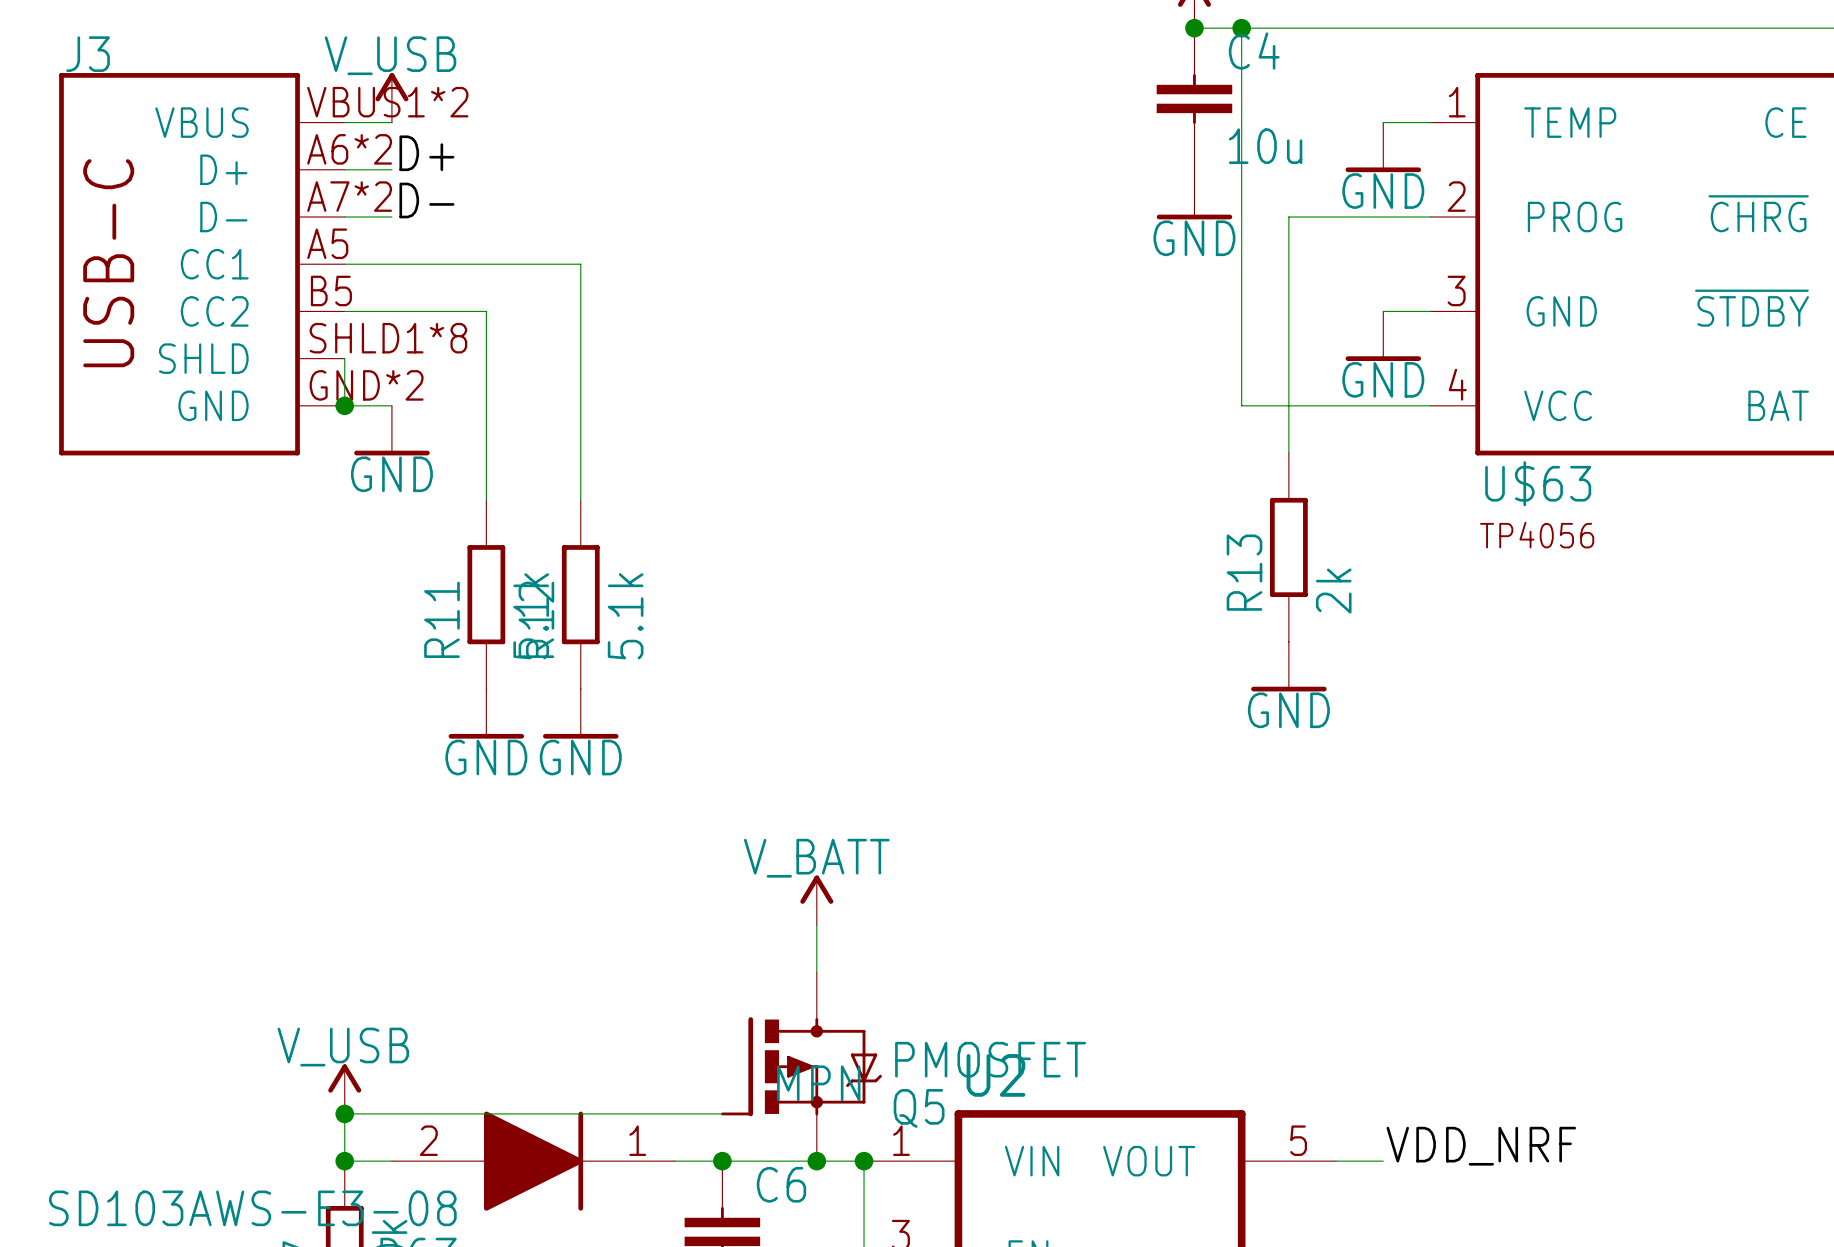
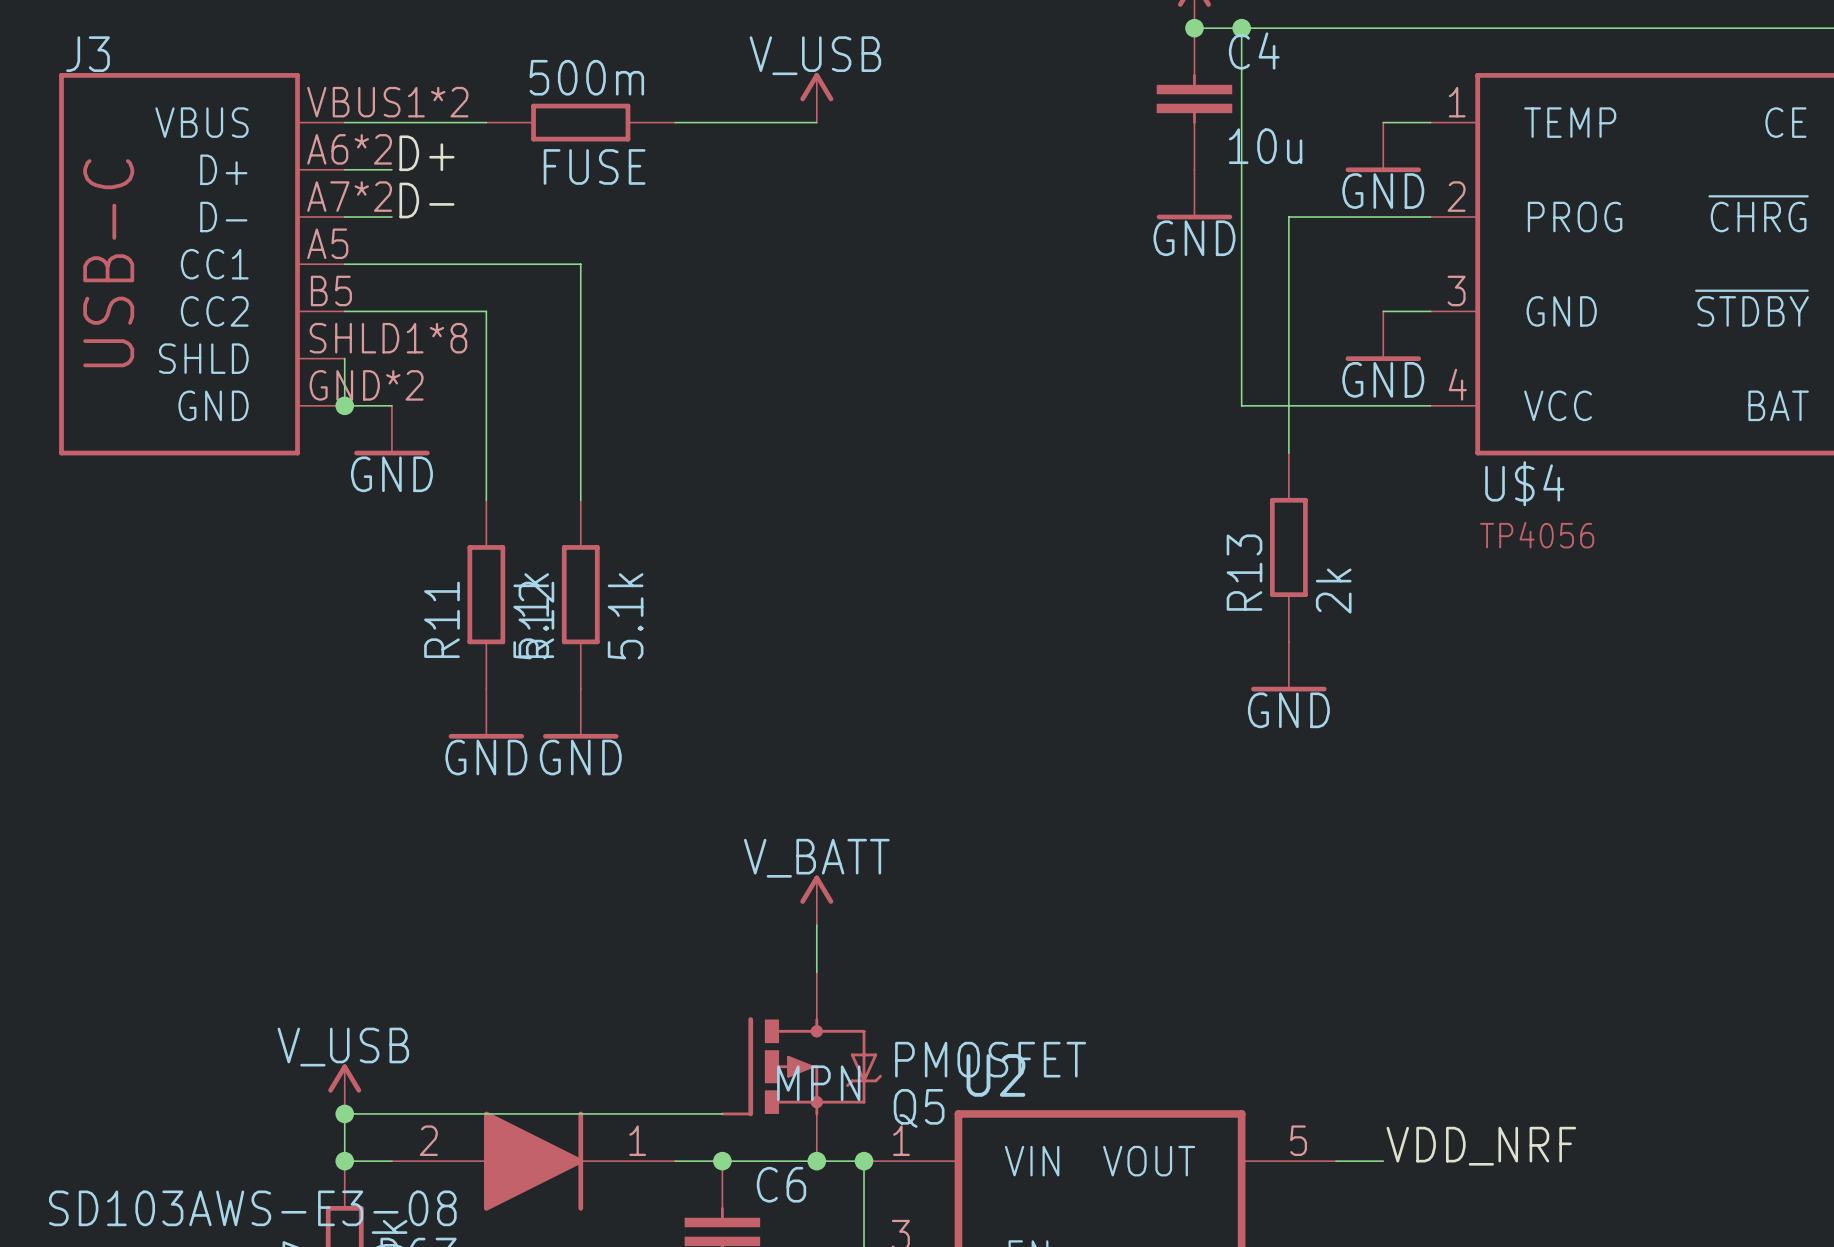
power symbol position: V_USB (391, 97) -> V_USB (816, 97)
wire: none -> (391, 122) (486, 122)
FUSE: none -> 500m (580, 122)
wire: none -> (675, 122) (816, 122)
U$63 name: U$63 (1538, 483) -> U$4 (1524, 483)

